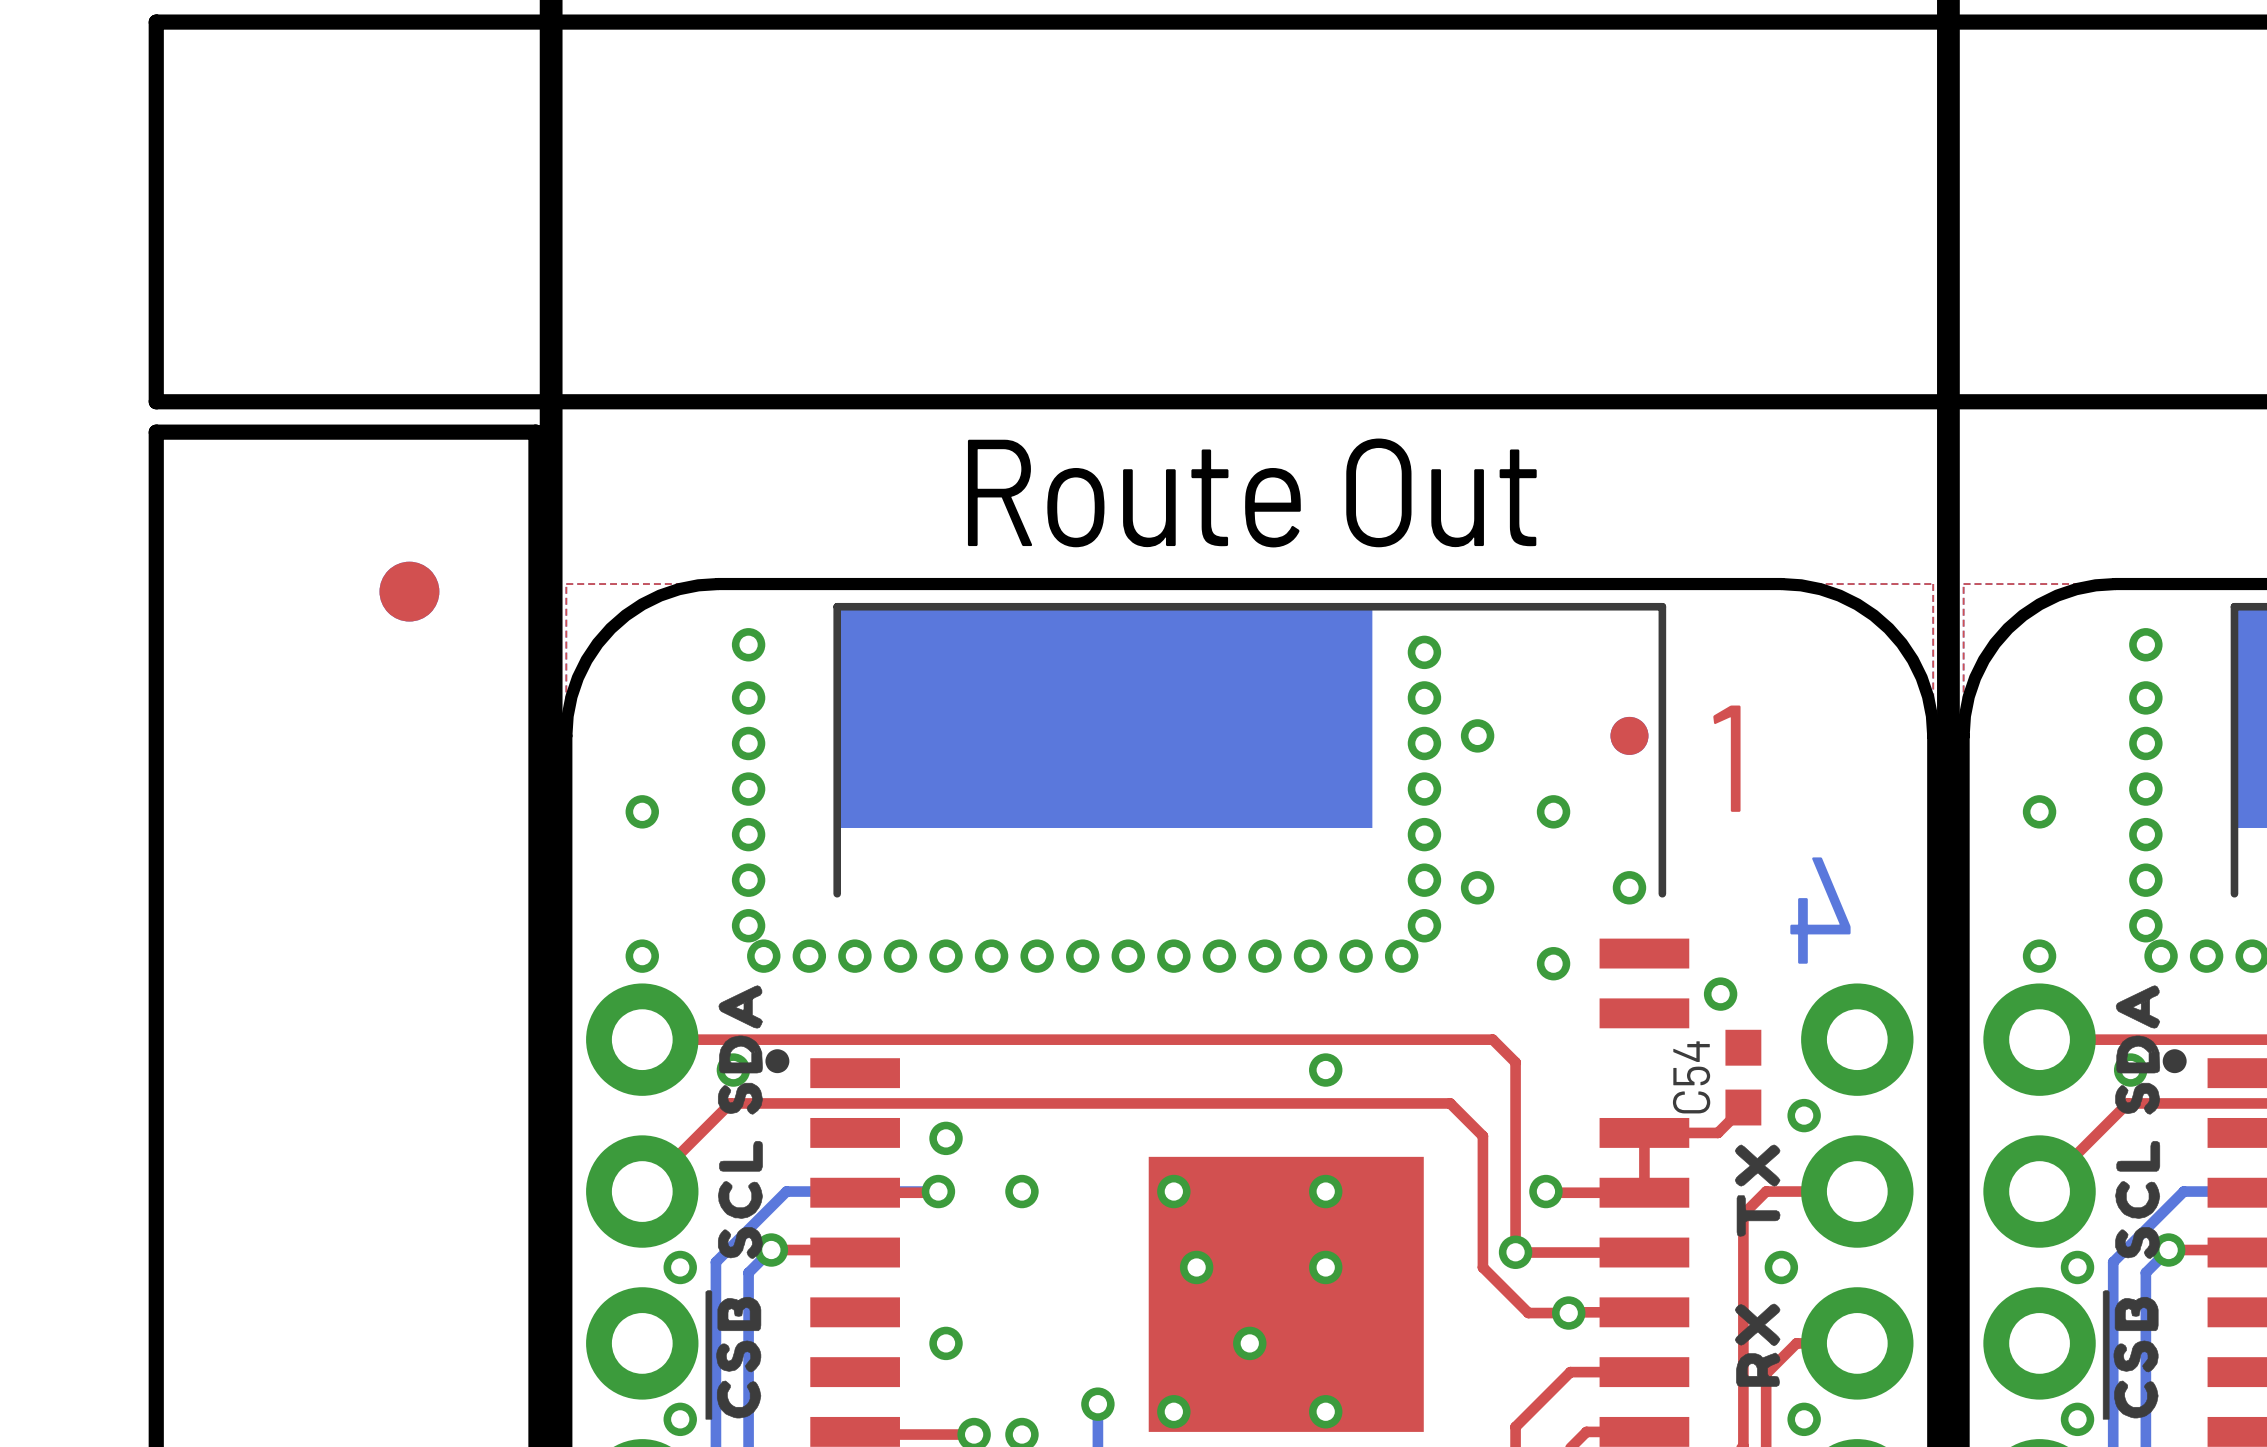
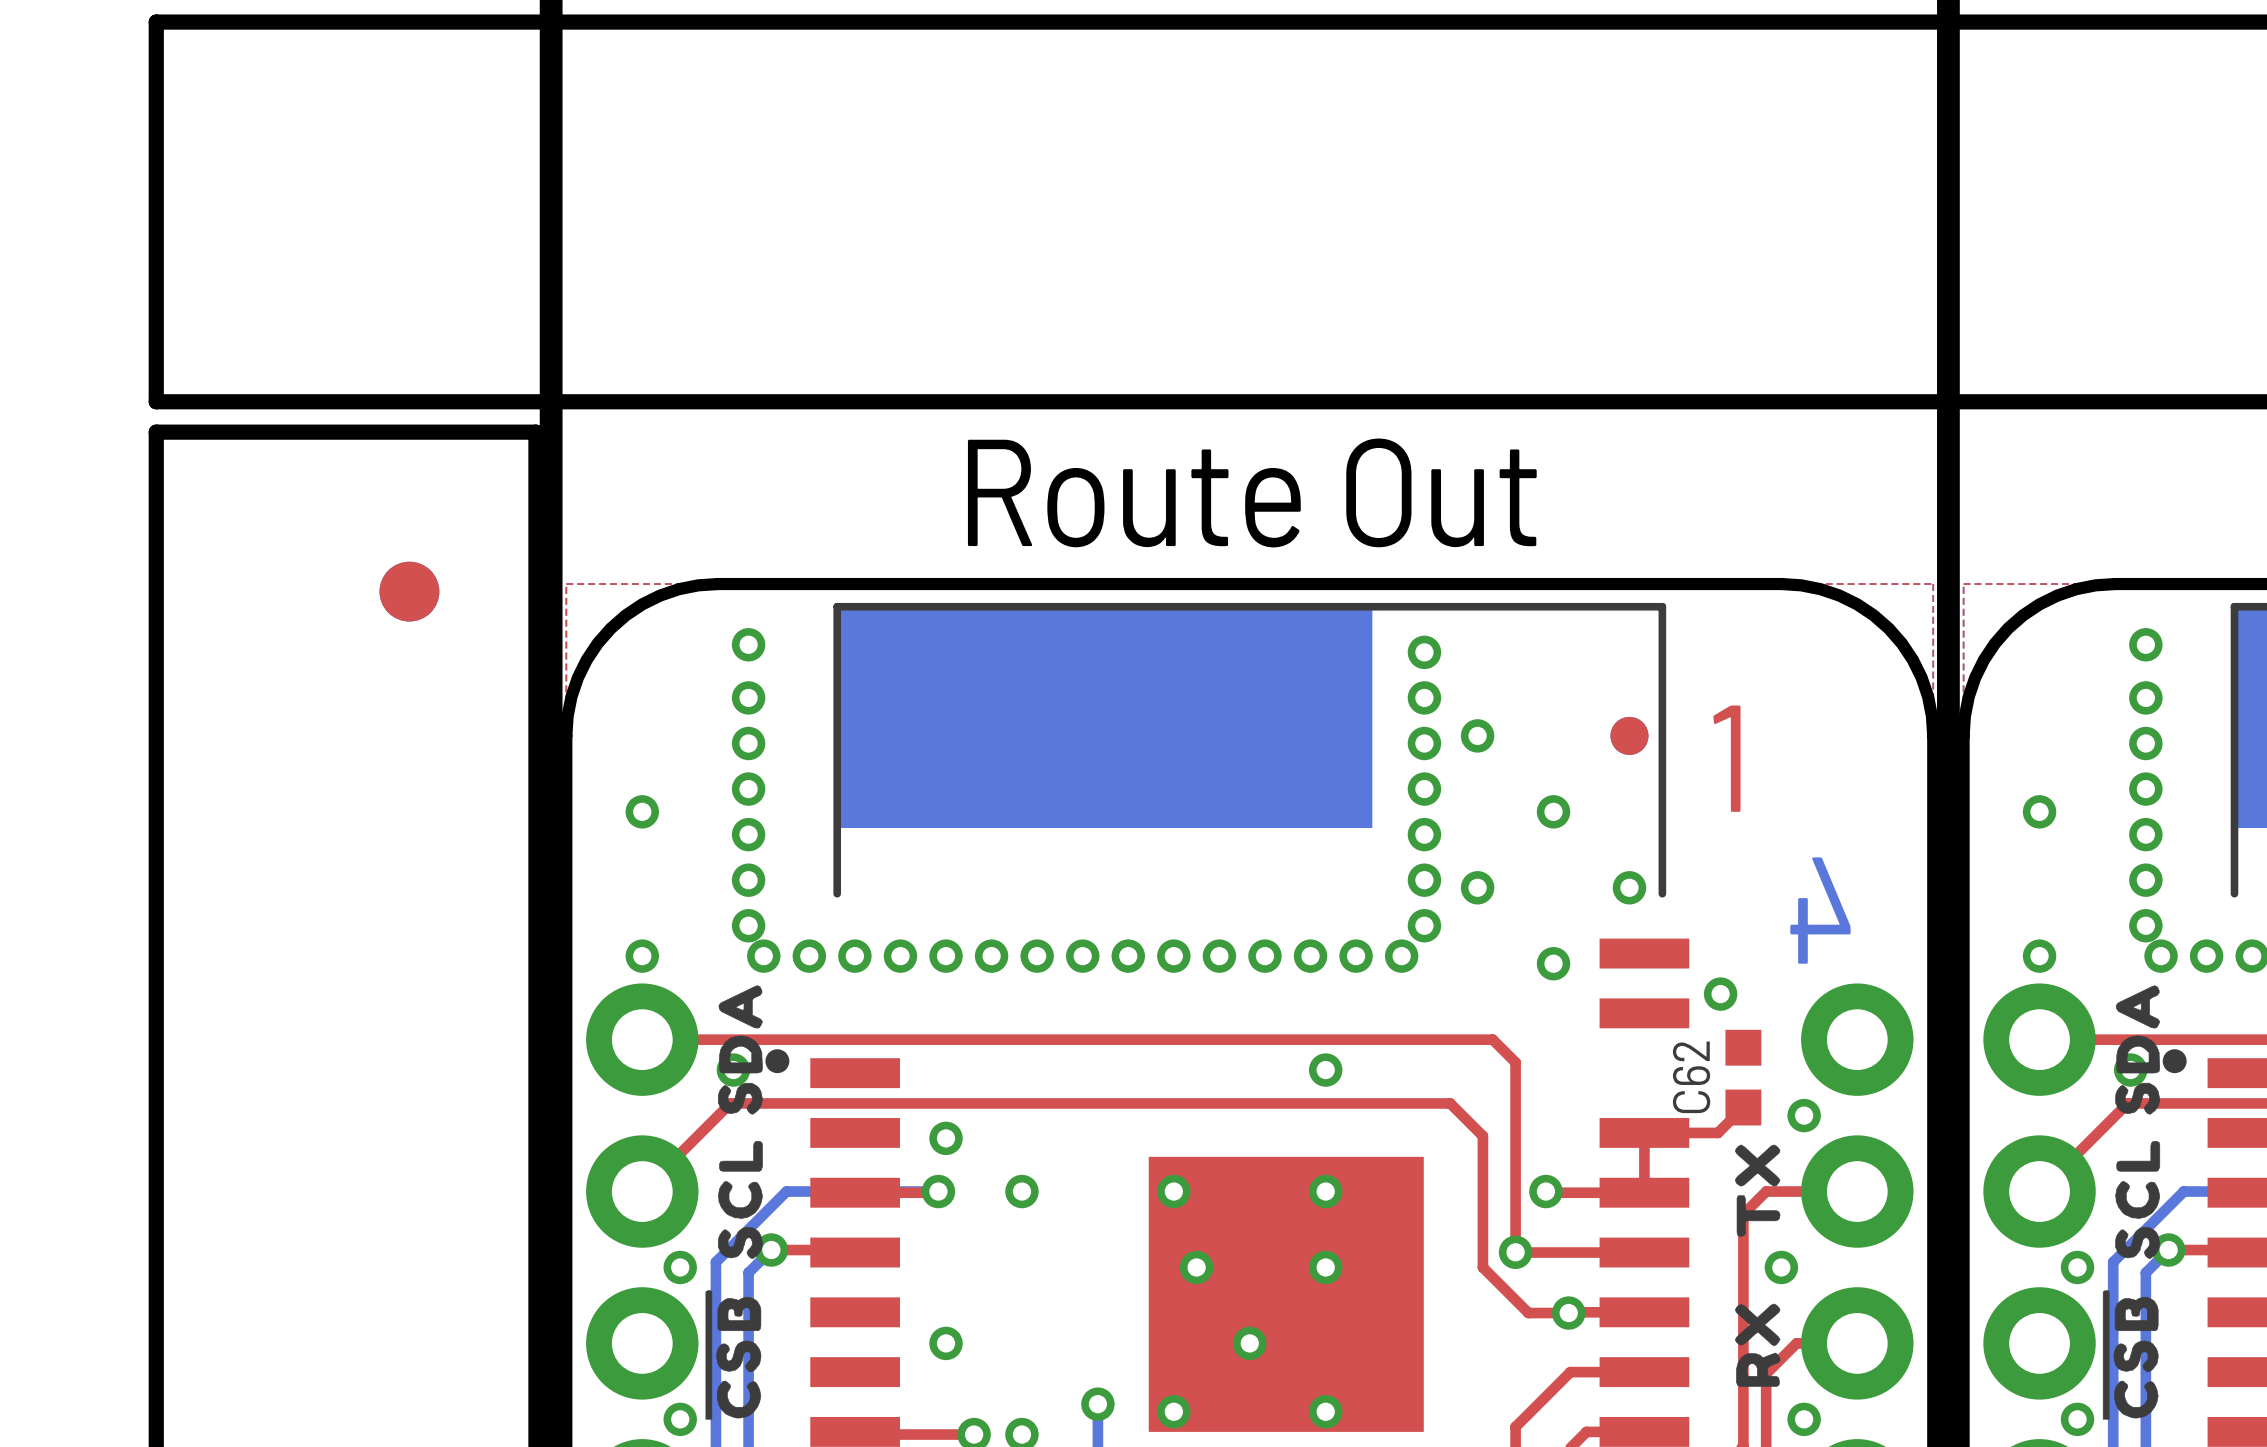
C54 name: C54 (1691, 1077) -> C62 (1691, 1077)

